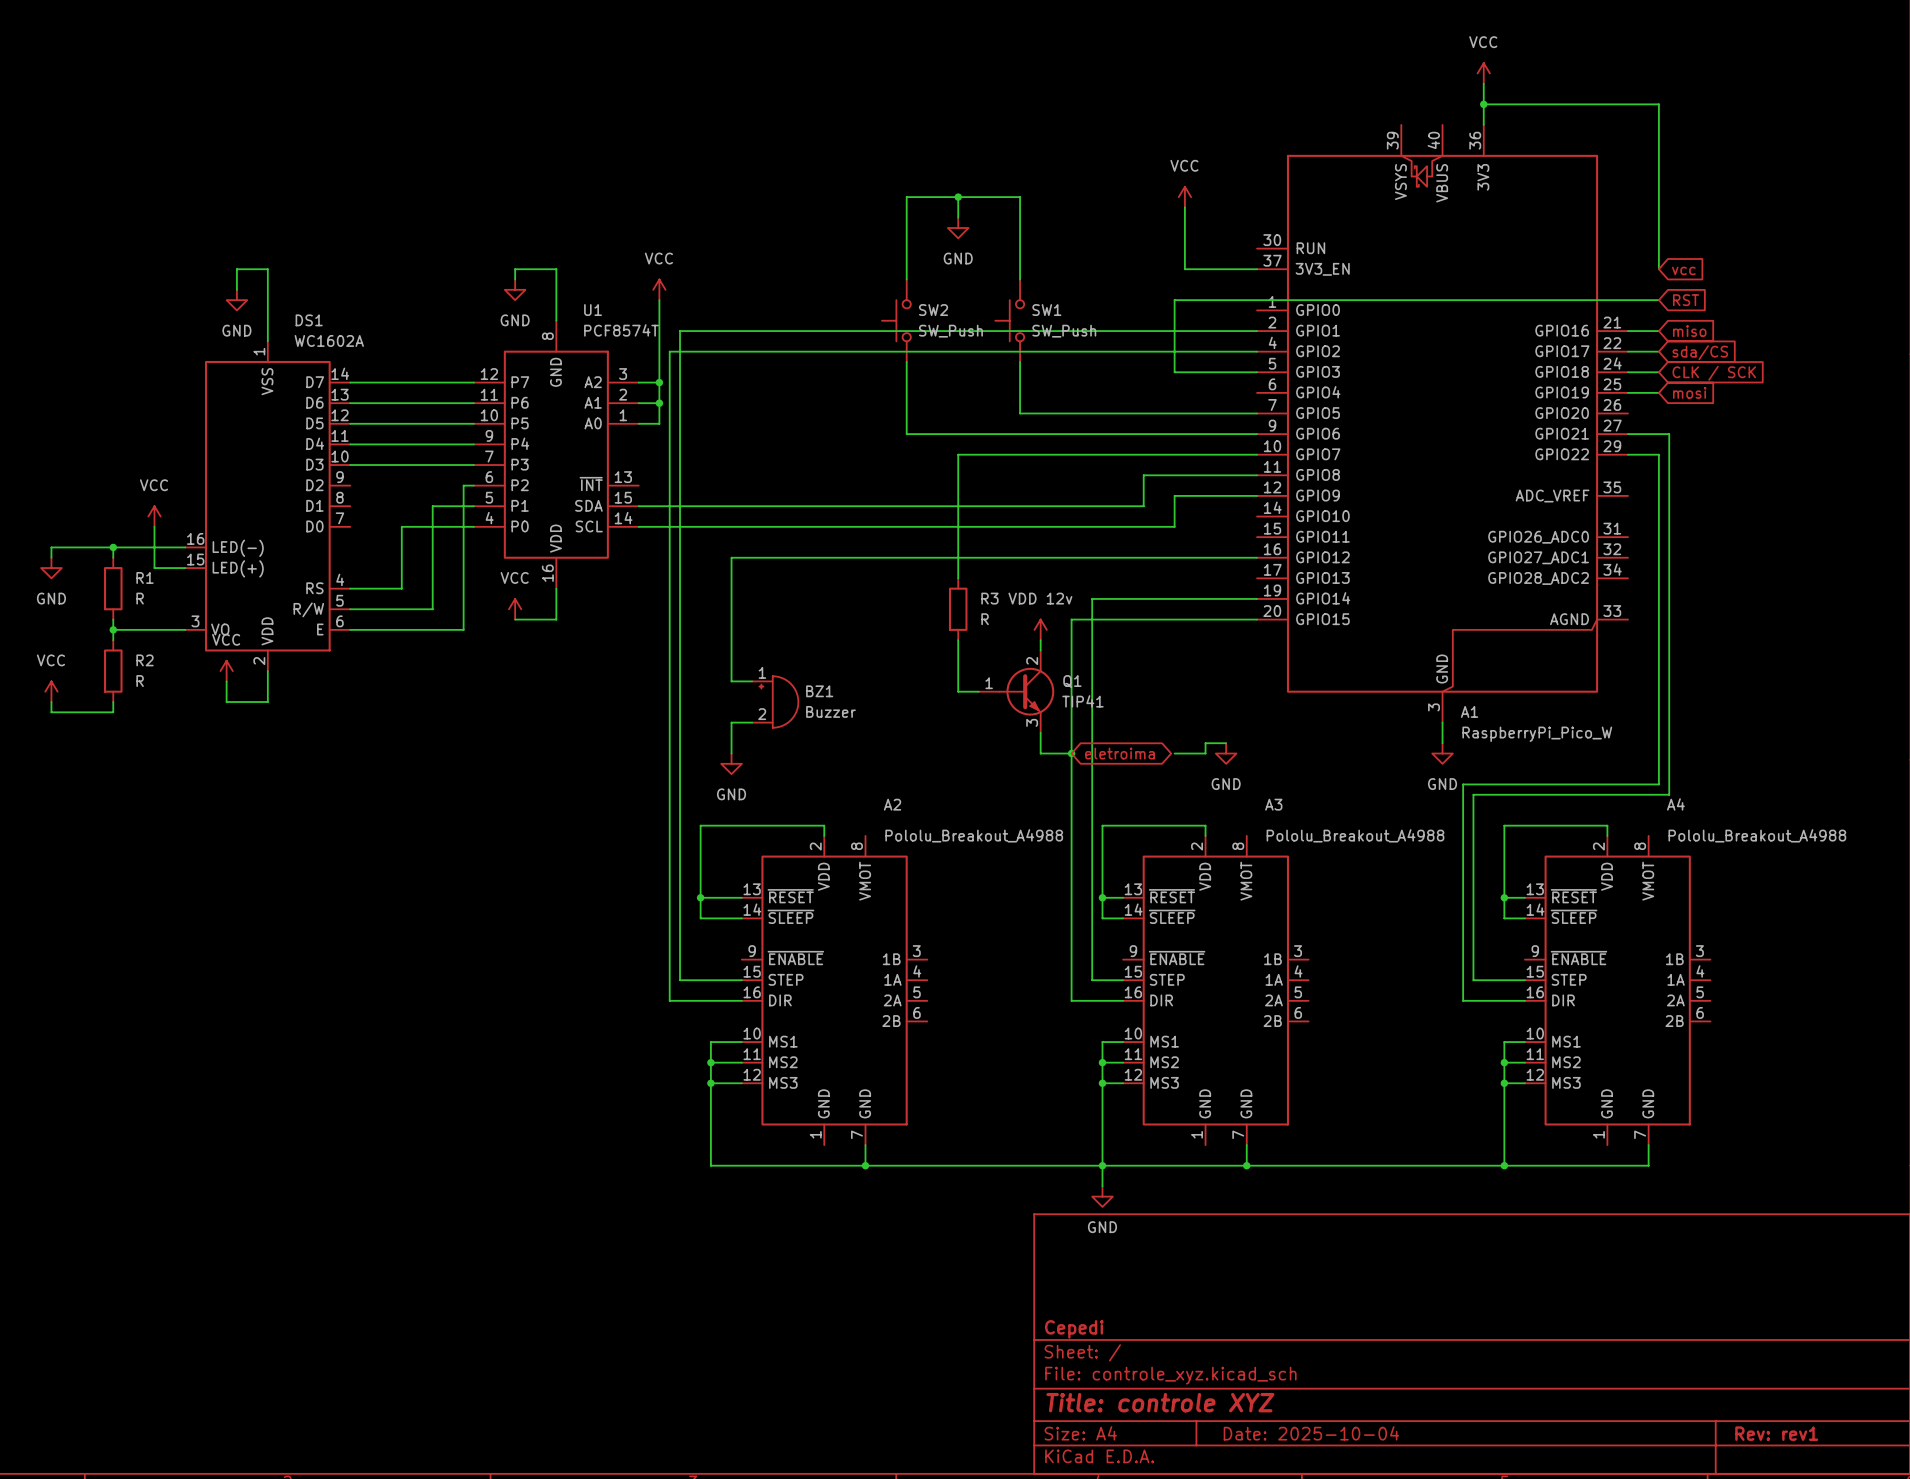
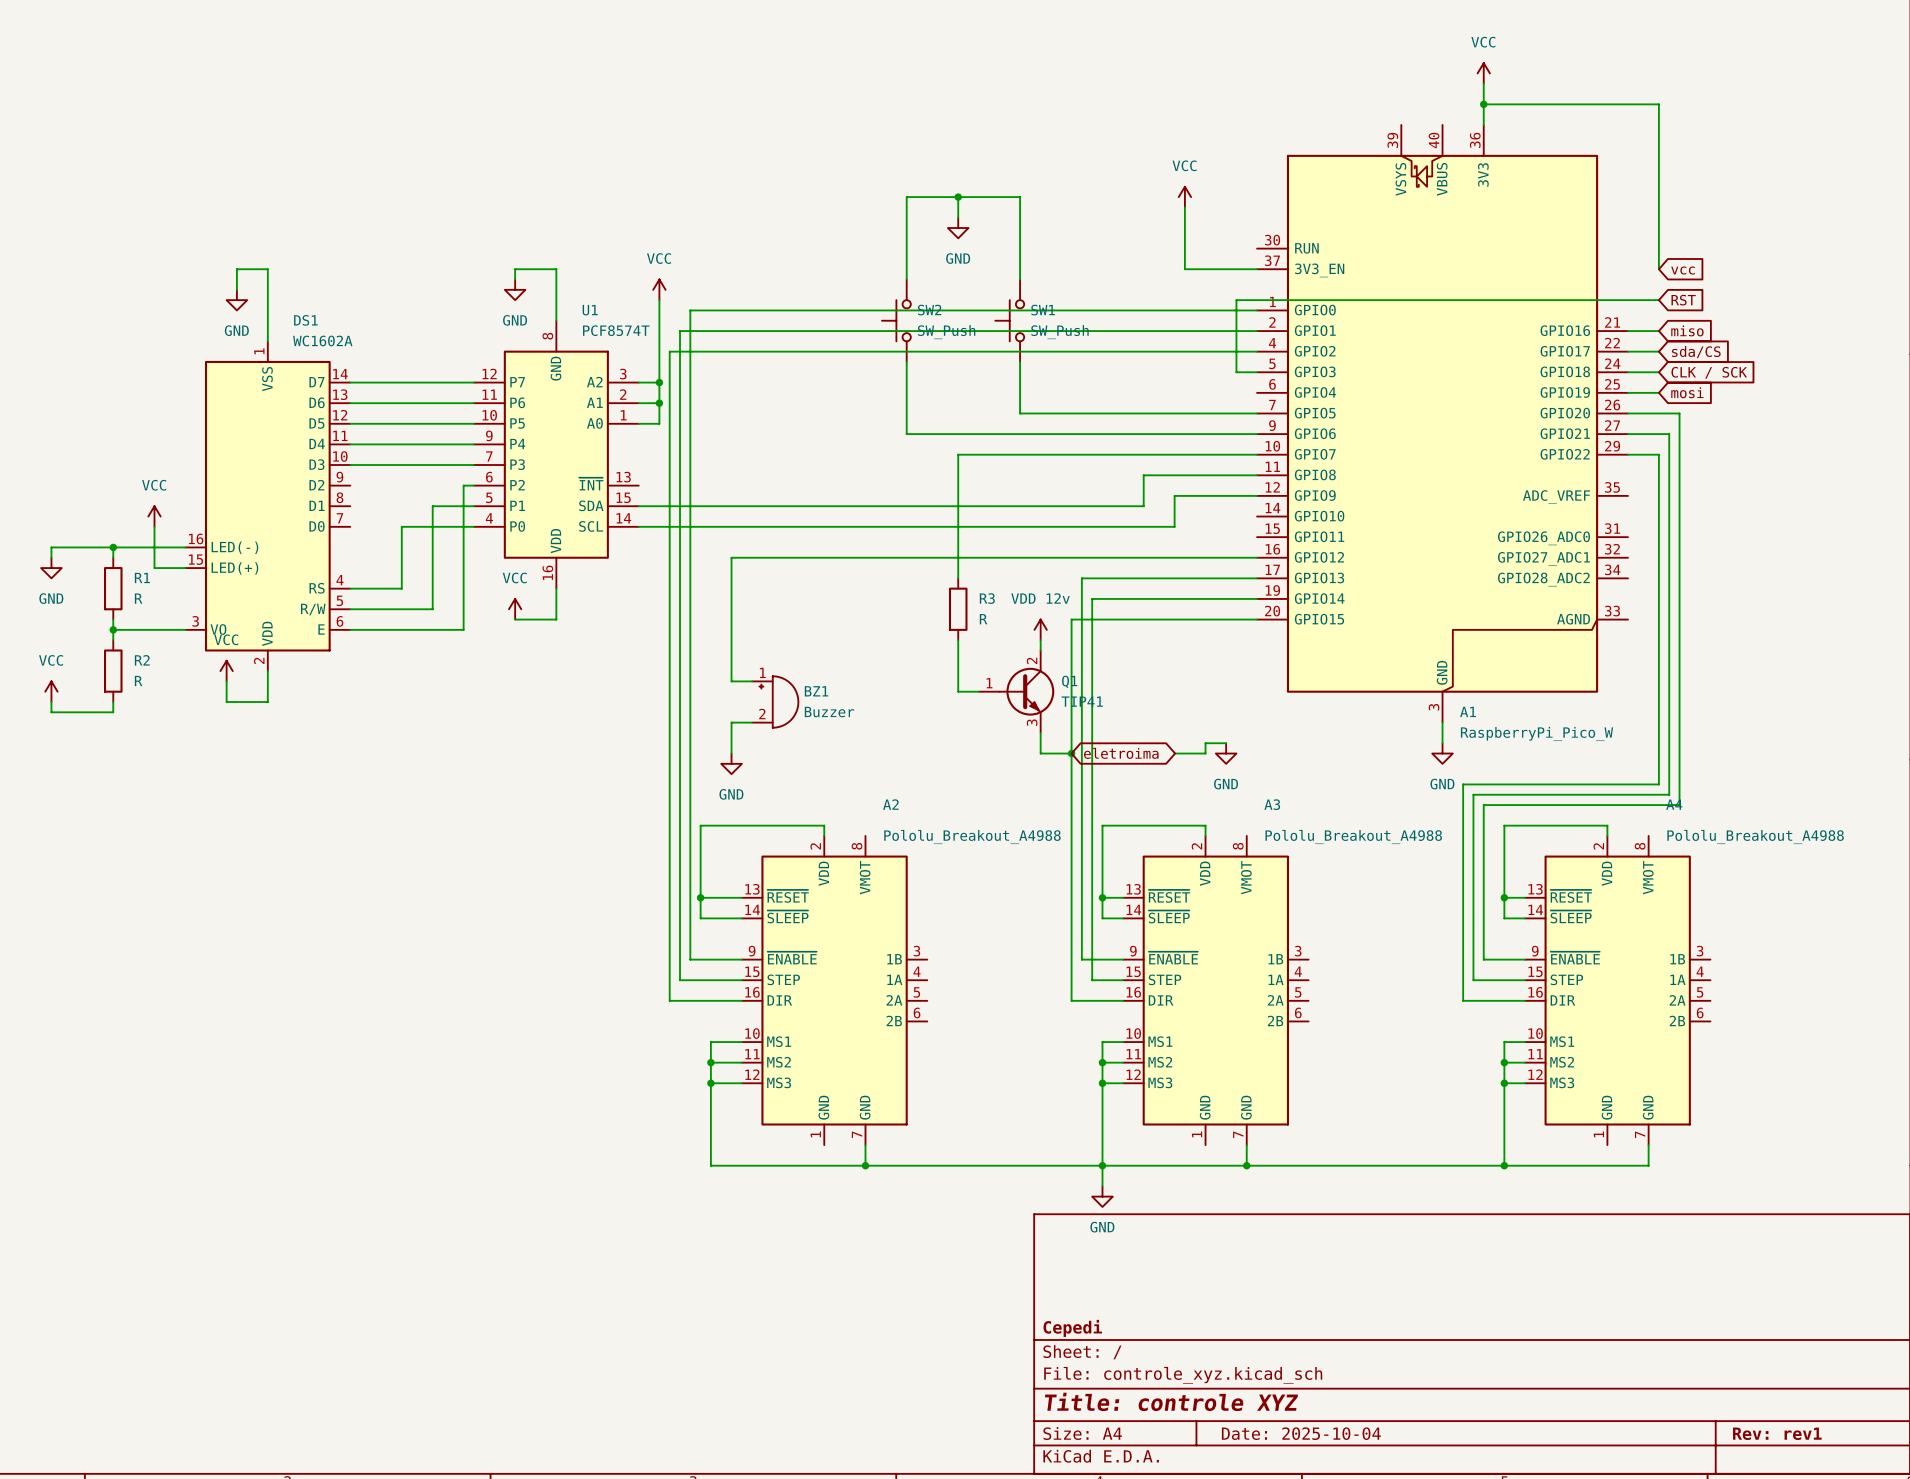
wire: (1236, 300) (1174, 300) (1174, 372) (1236, 372) -> (1236, 300) (1236, 372)
wire: none -> (1257, 310) (690, 310) (690, 959) (741, 959)
wire: none -> (1628, 413) (1679, 413) (1679, 805) (1483, 805) (1483, 959) (1524, 959)
wire: none -> (1257, 578) (1081, 578) (1081, 959) (1123, 959)

